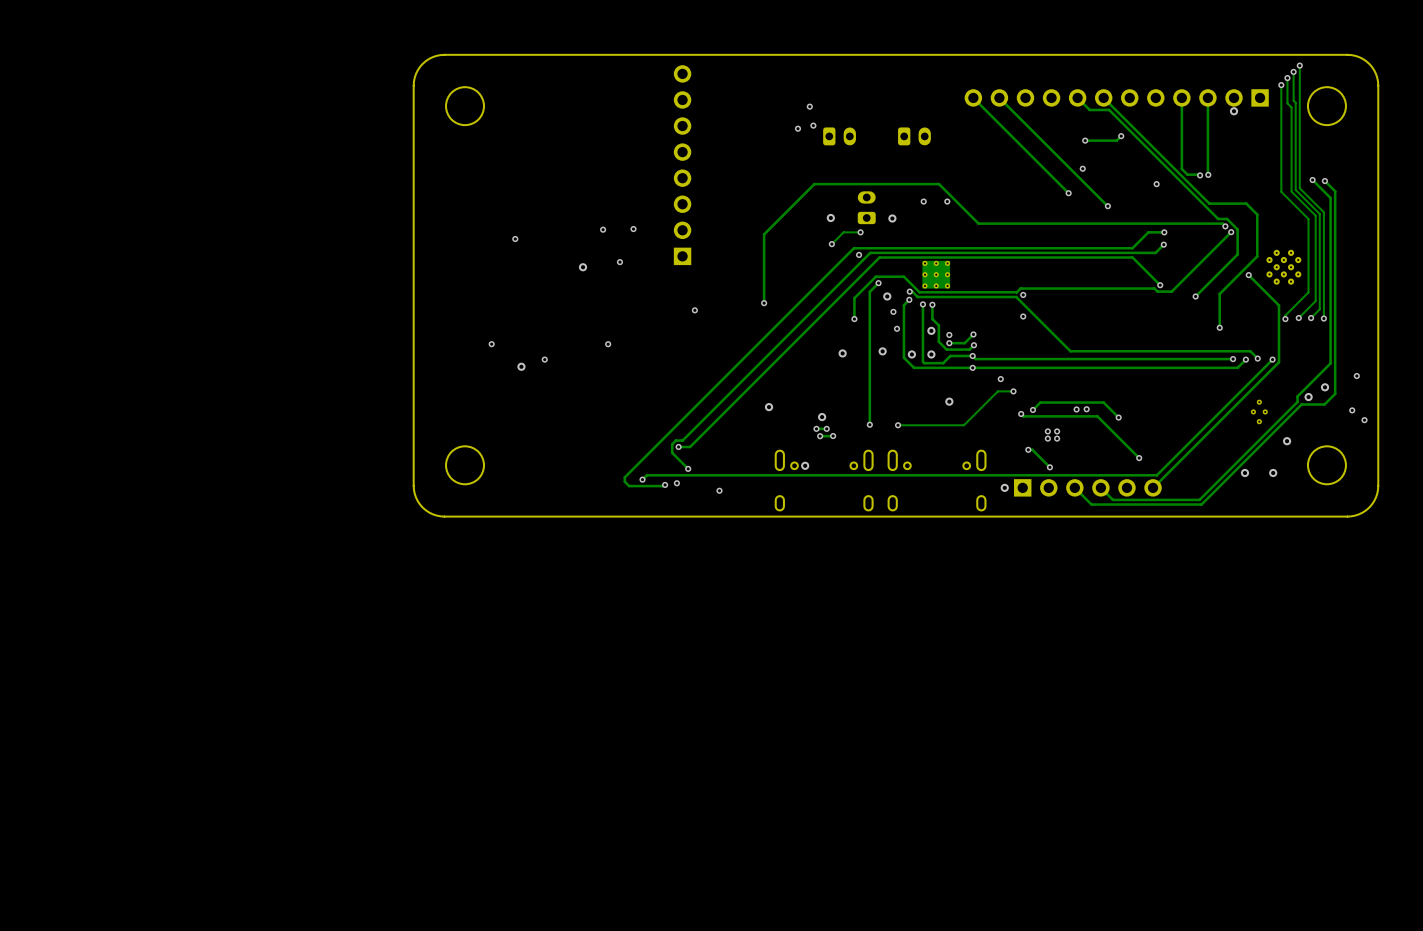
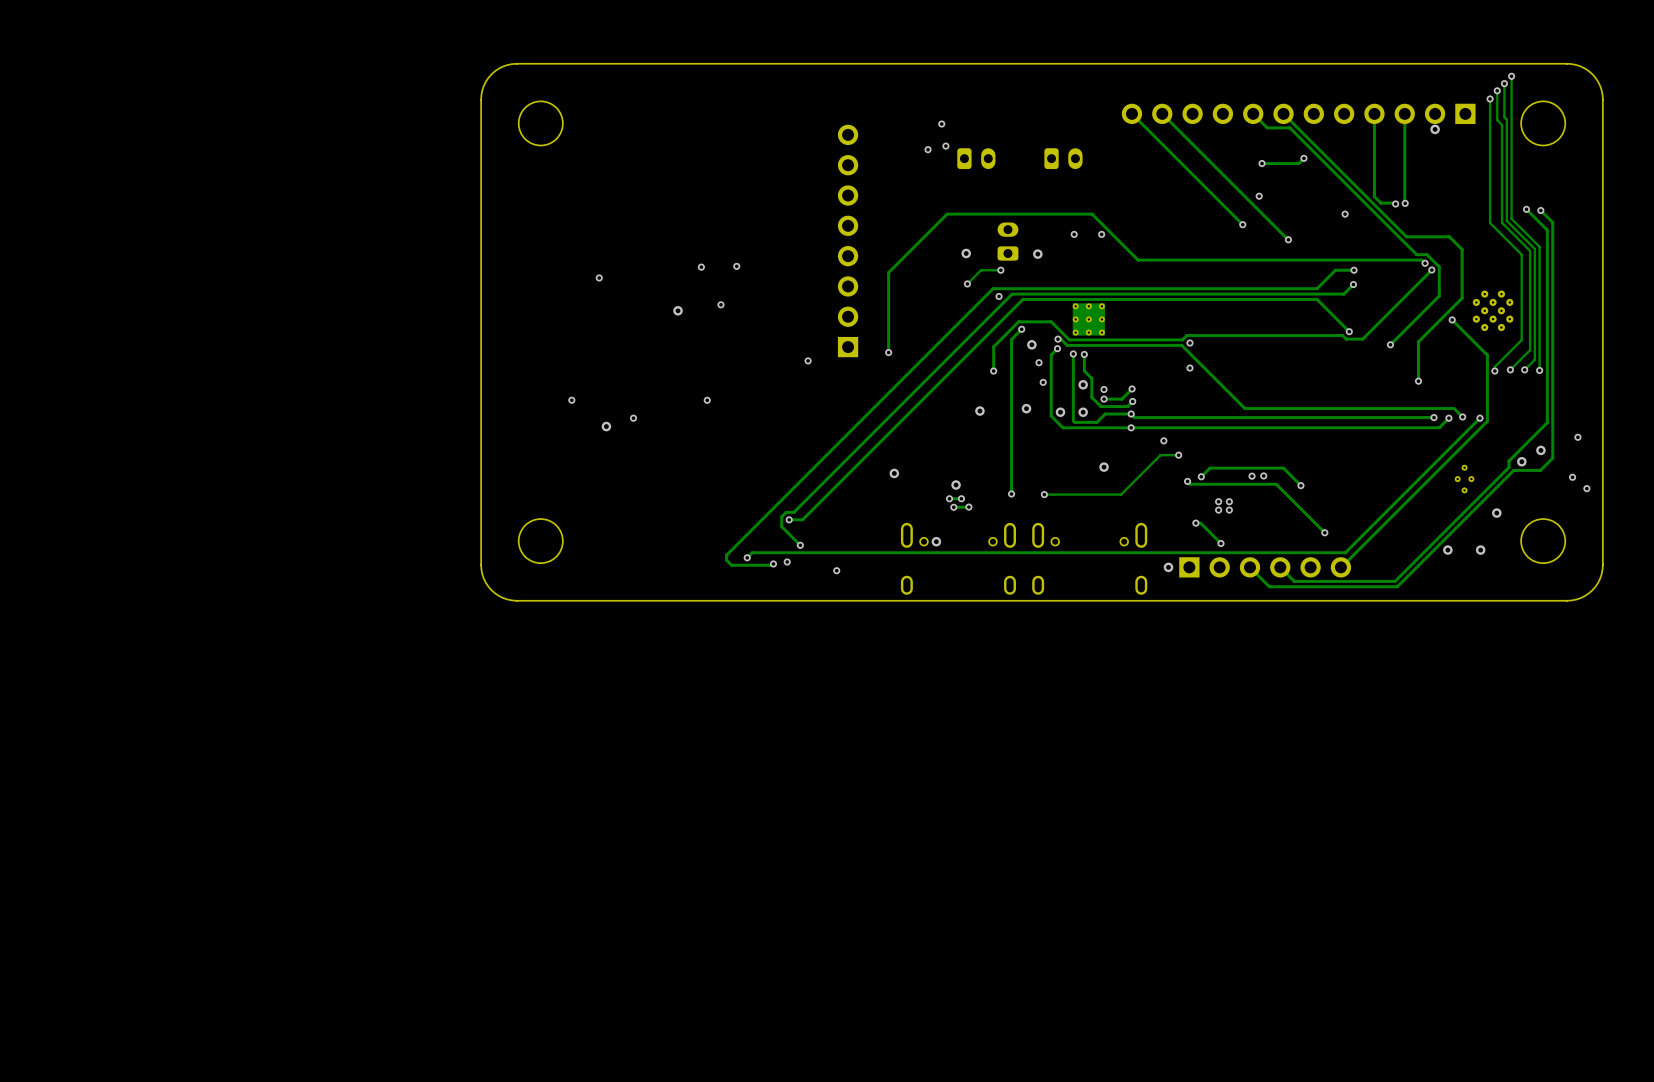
part position: (682, 165) -> (848, 240)

